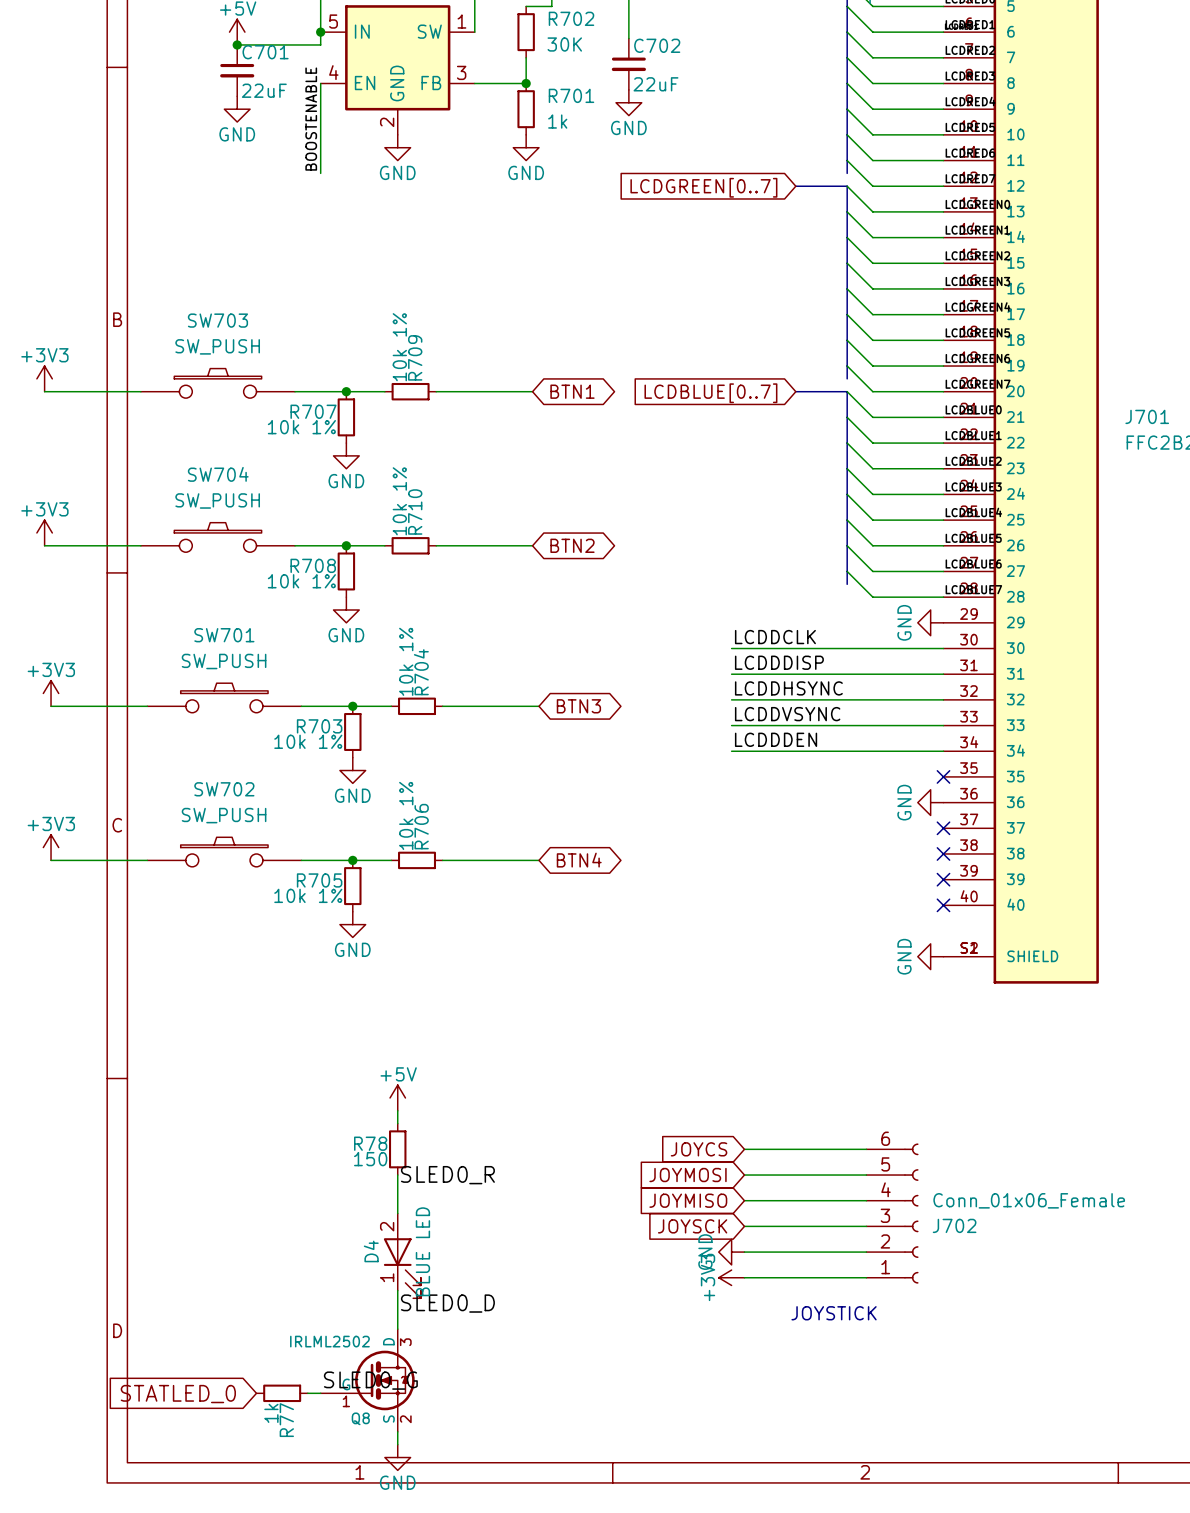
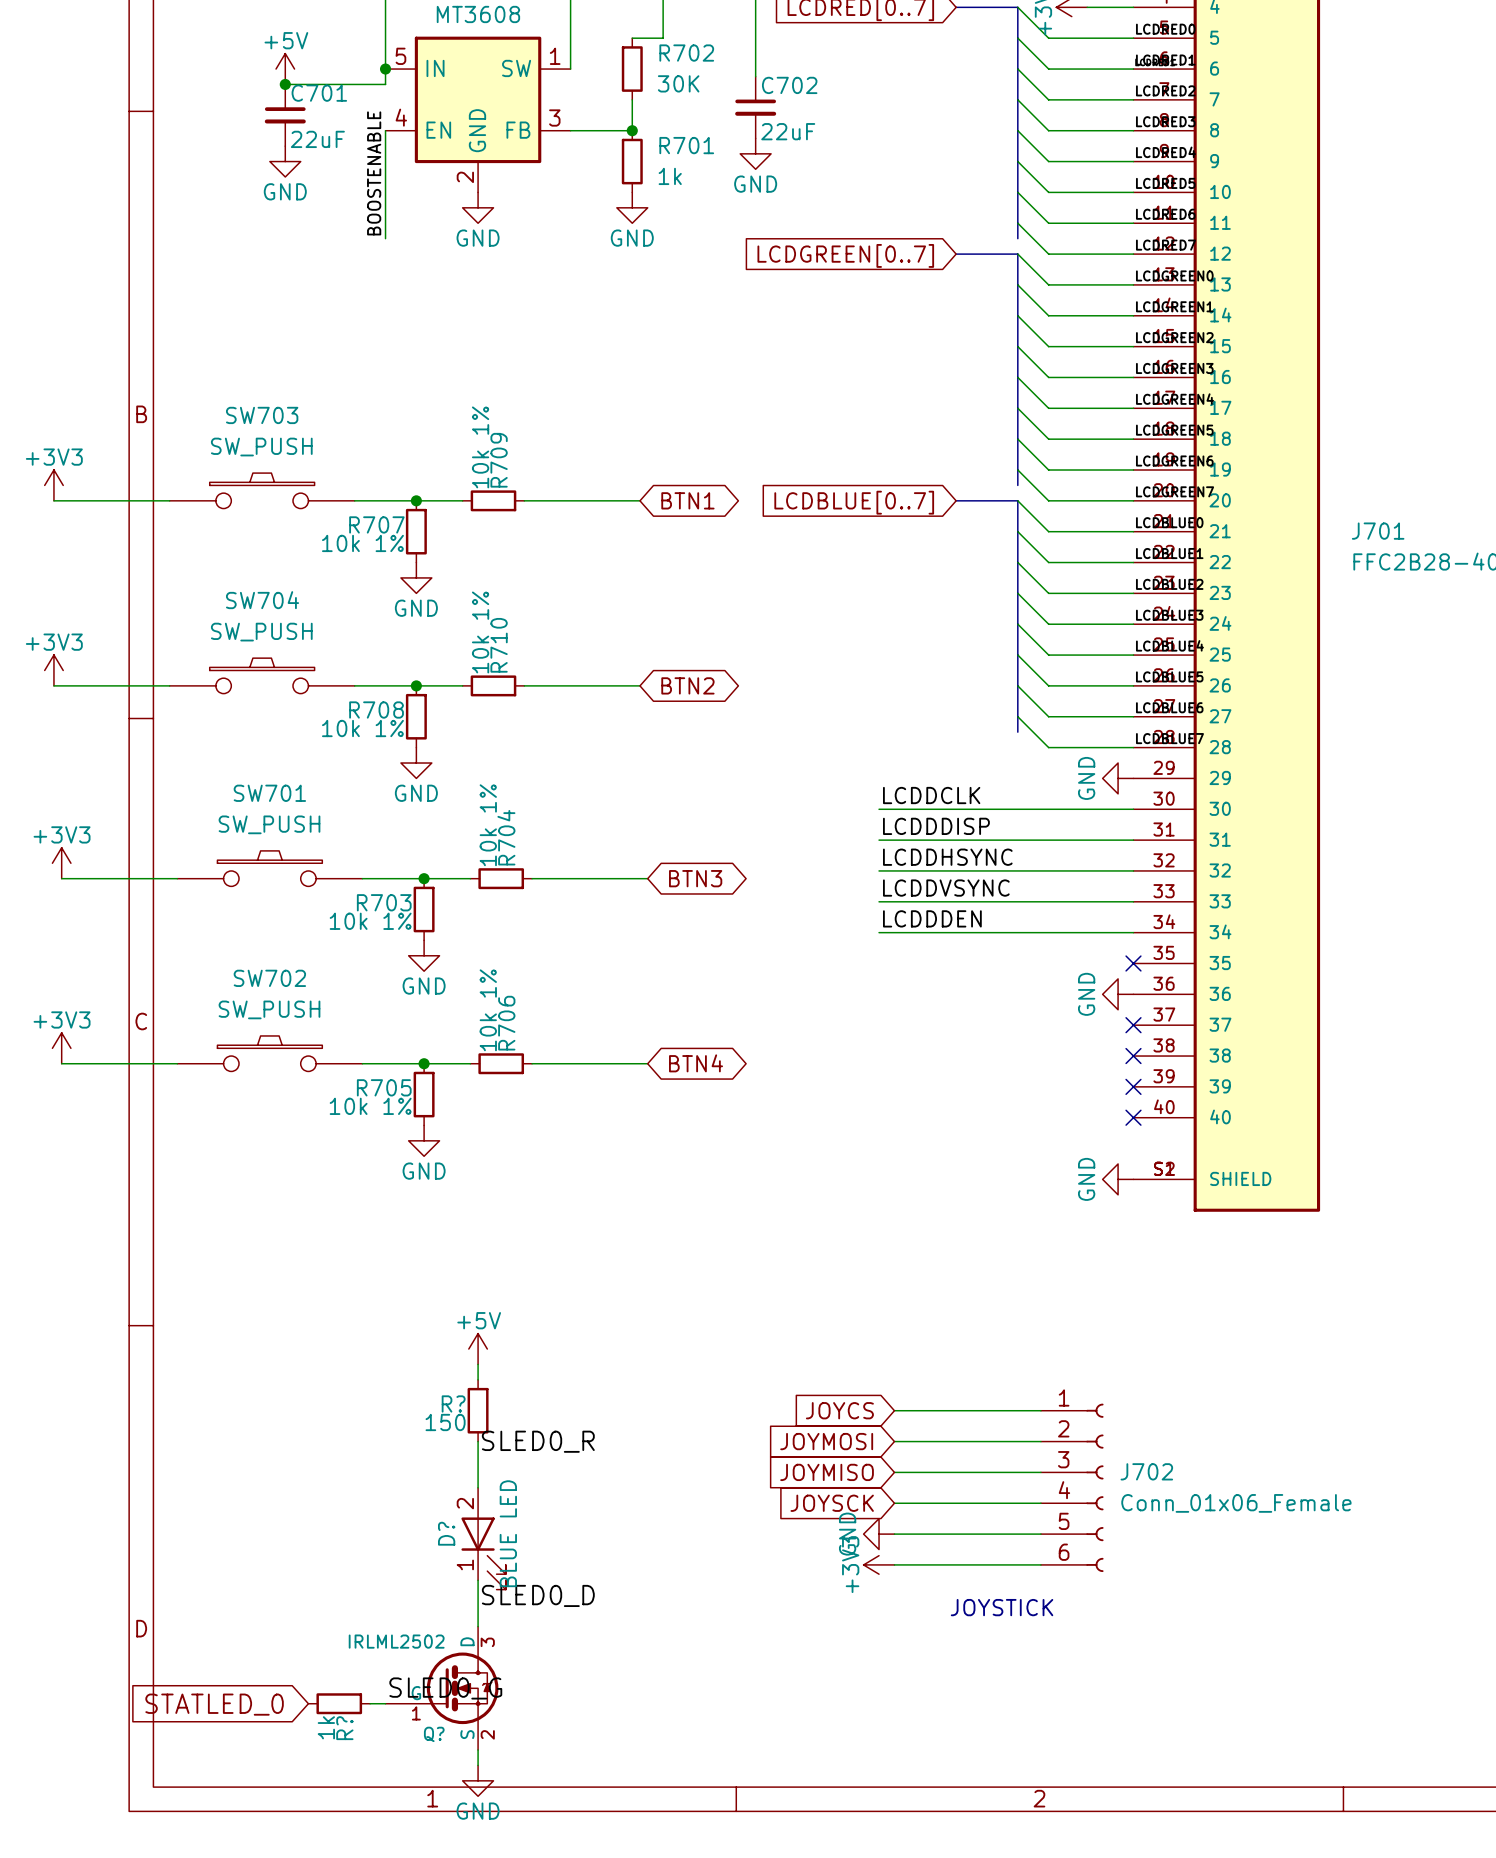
R78 name: R78 (370, 1143) -> R? (453, 1403)
J702 flip: as is (911, 1213) -> up-down (1094, 1487)
D4 name: D4 (371, 1251) -> D? (446, 1533)
Q8 name: Q8 (360, 1418) -> Q? (434, 1734)
R77 name: R77 (286, 1420) -> R? (344, 1728)

